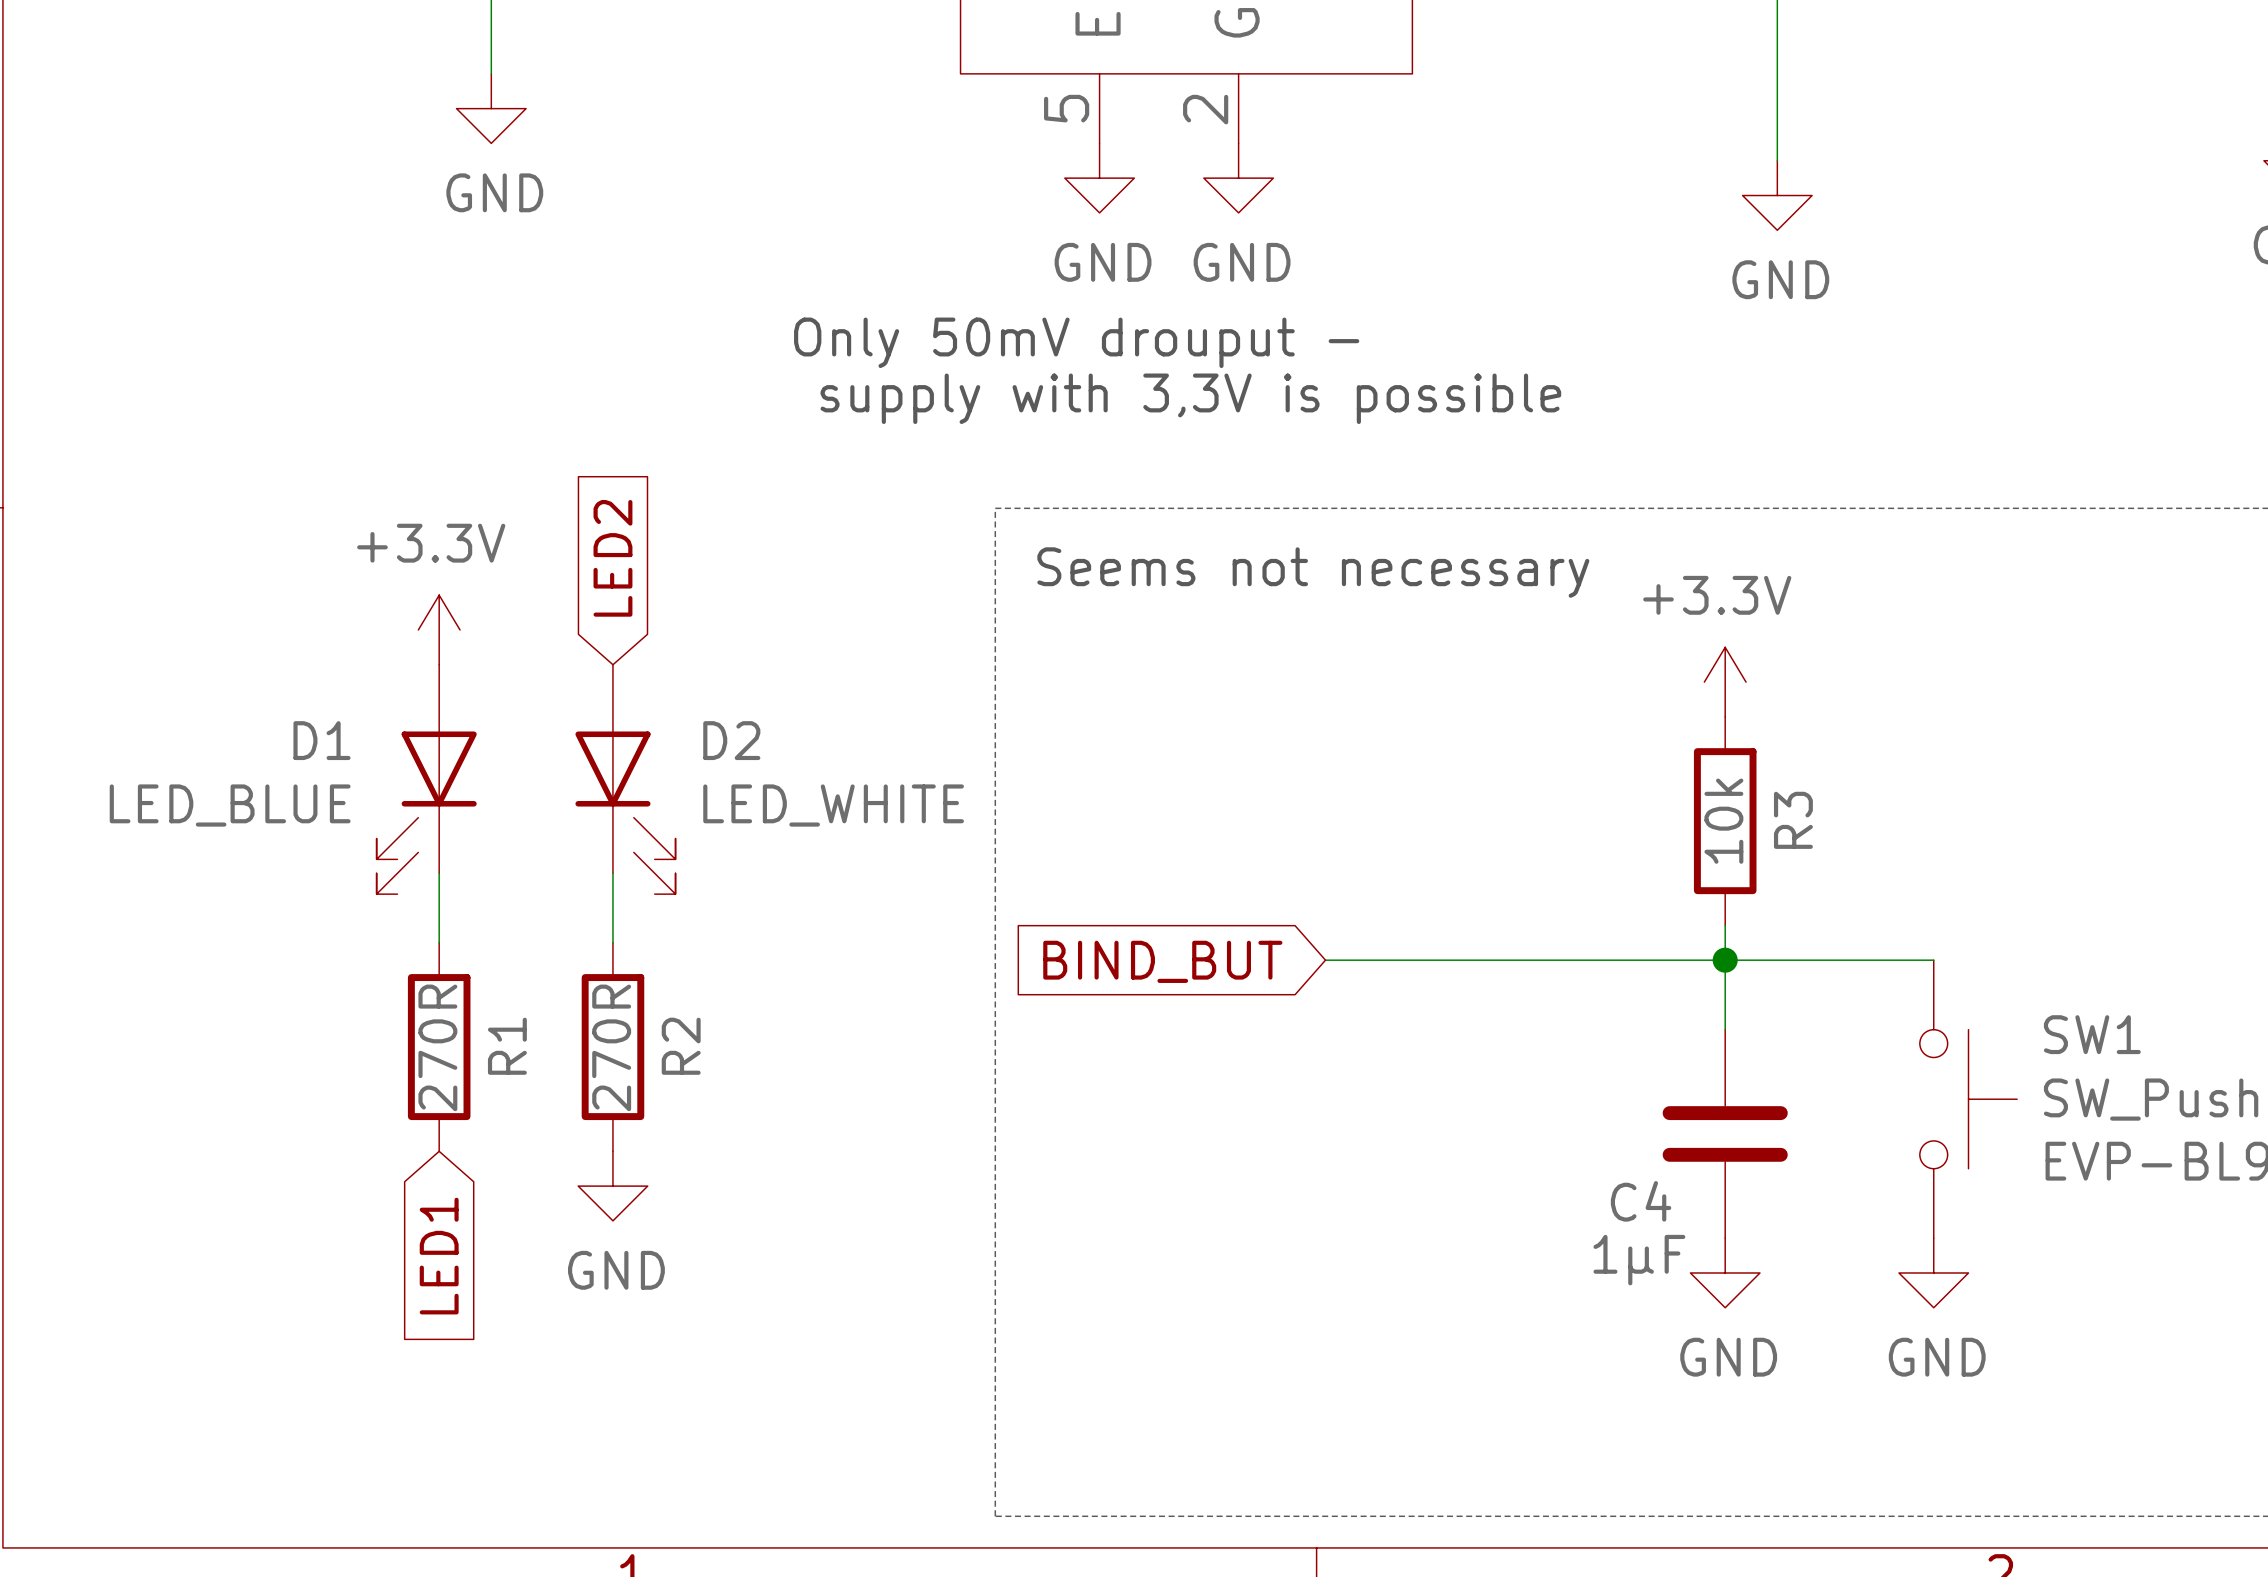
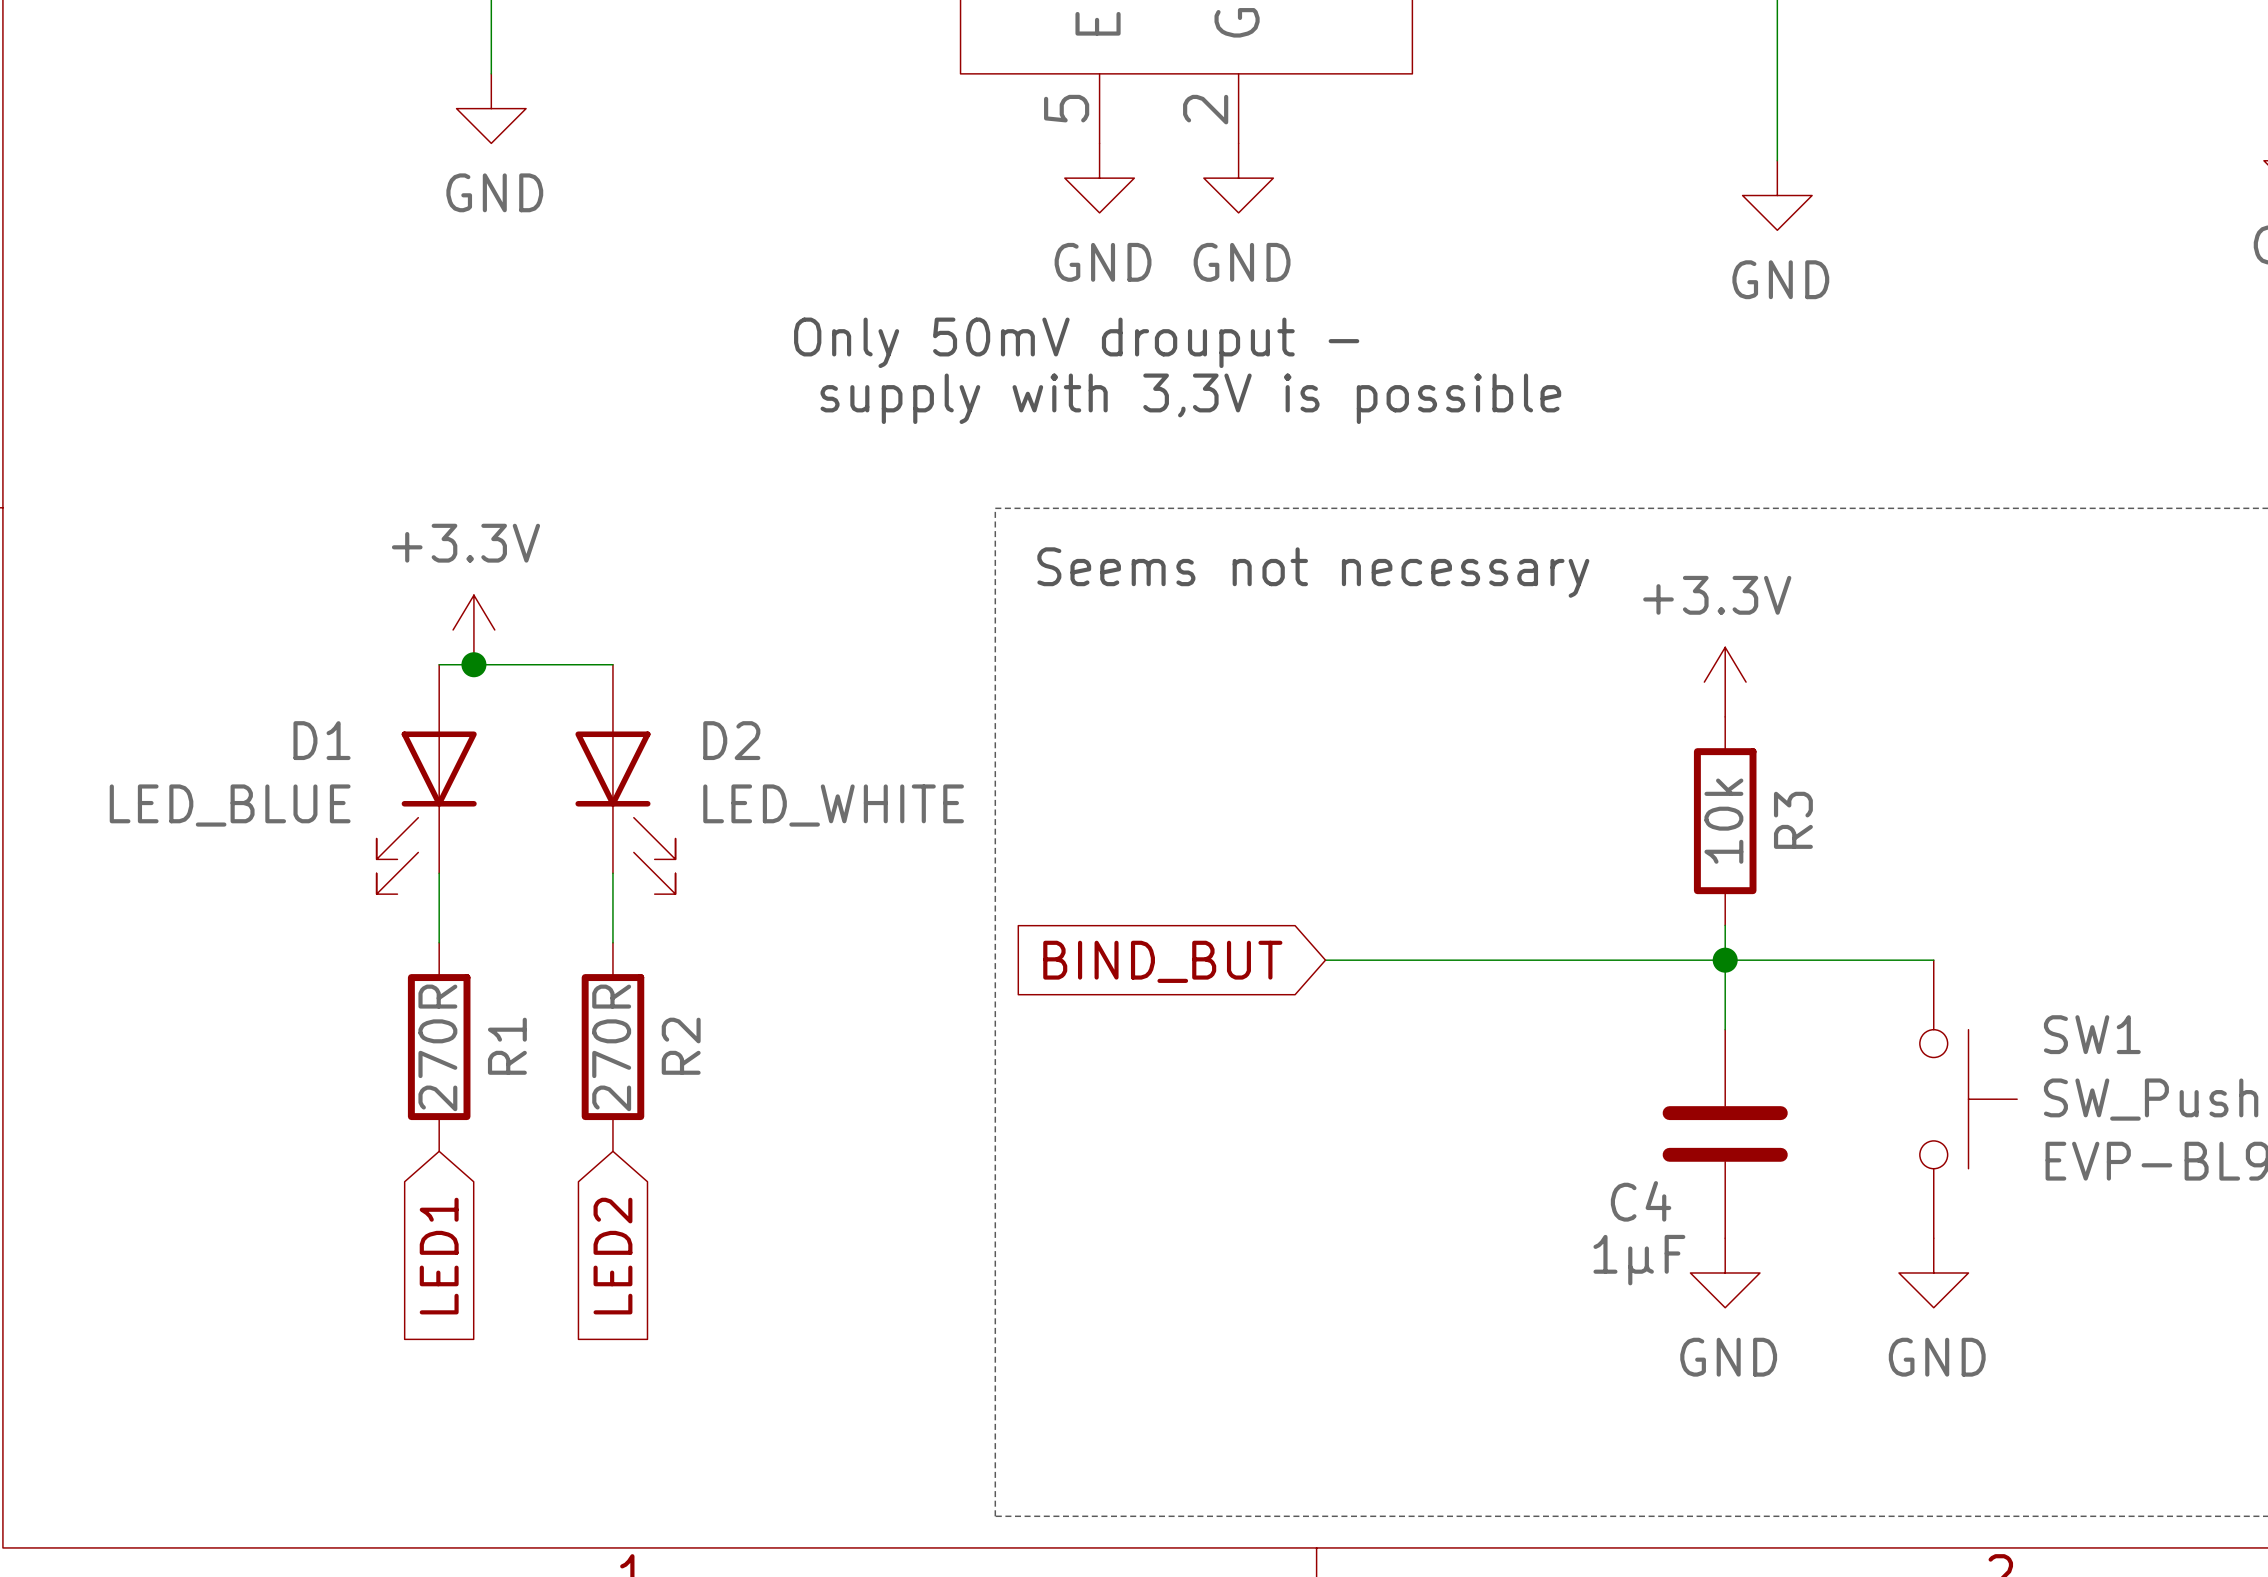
global label rotation: 0° (612, 558) -> 180° (612, 1256)
global label position: LED2 (612, 558) -> LED2 (612, 1256)
power symbol position: +3.3V (439, 629) -> +3.3V (473, 629)
wire: none -> (439, 664) (612, 664)
junction: none -> (473, 664)
power symbol: GND (612, 1186) -> none

